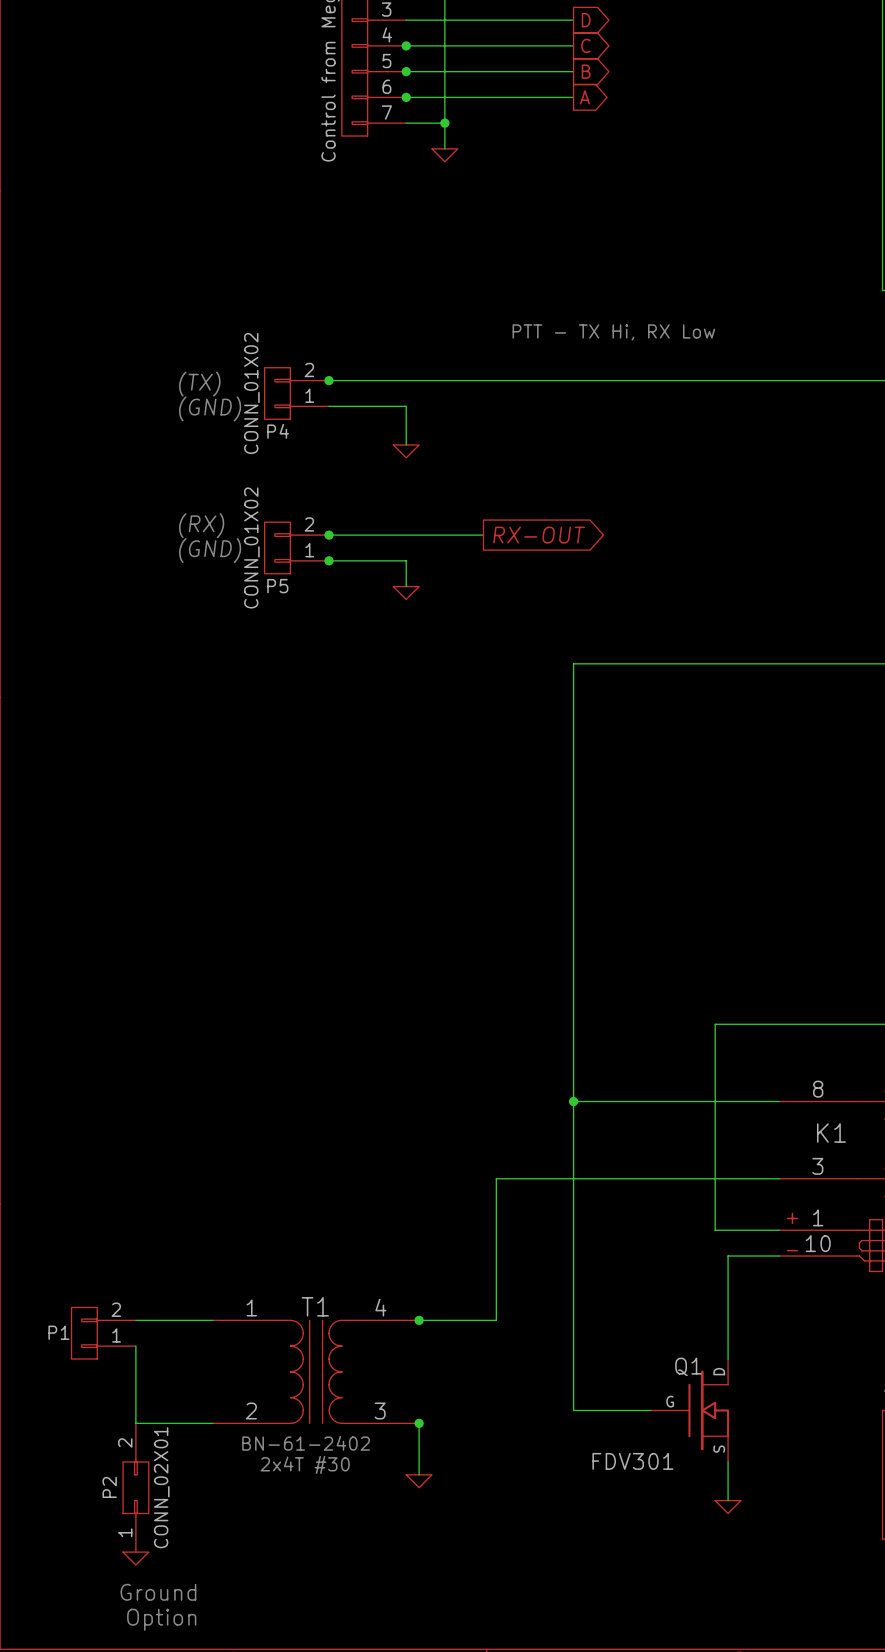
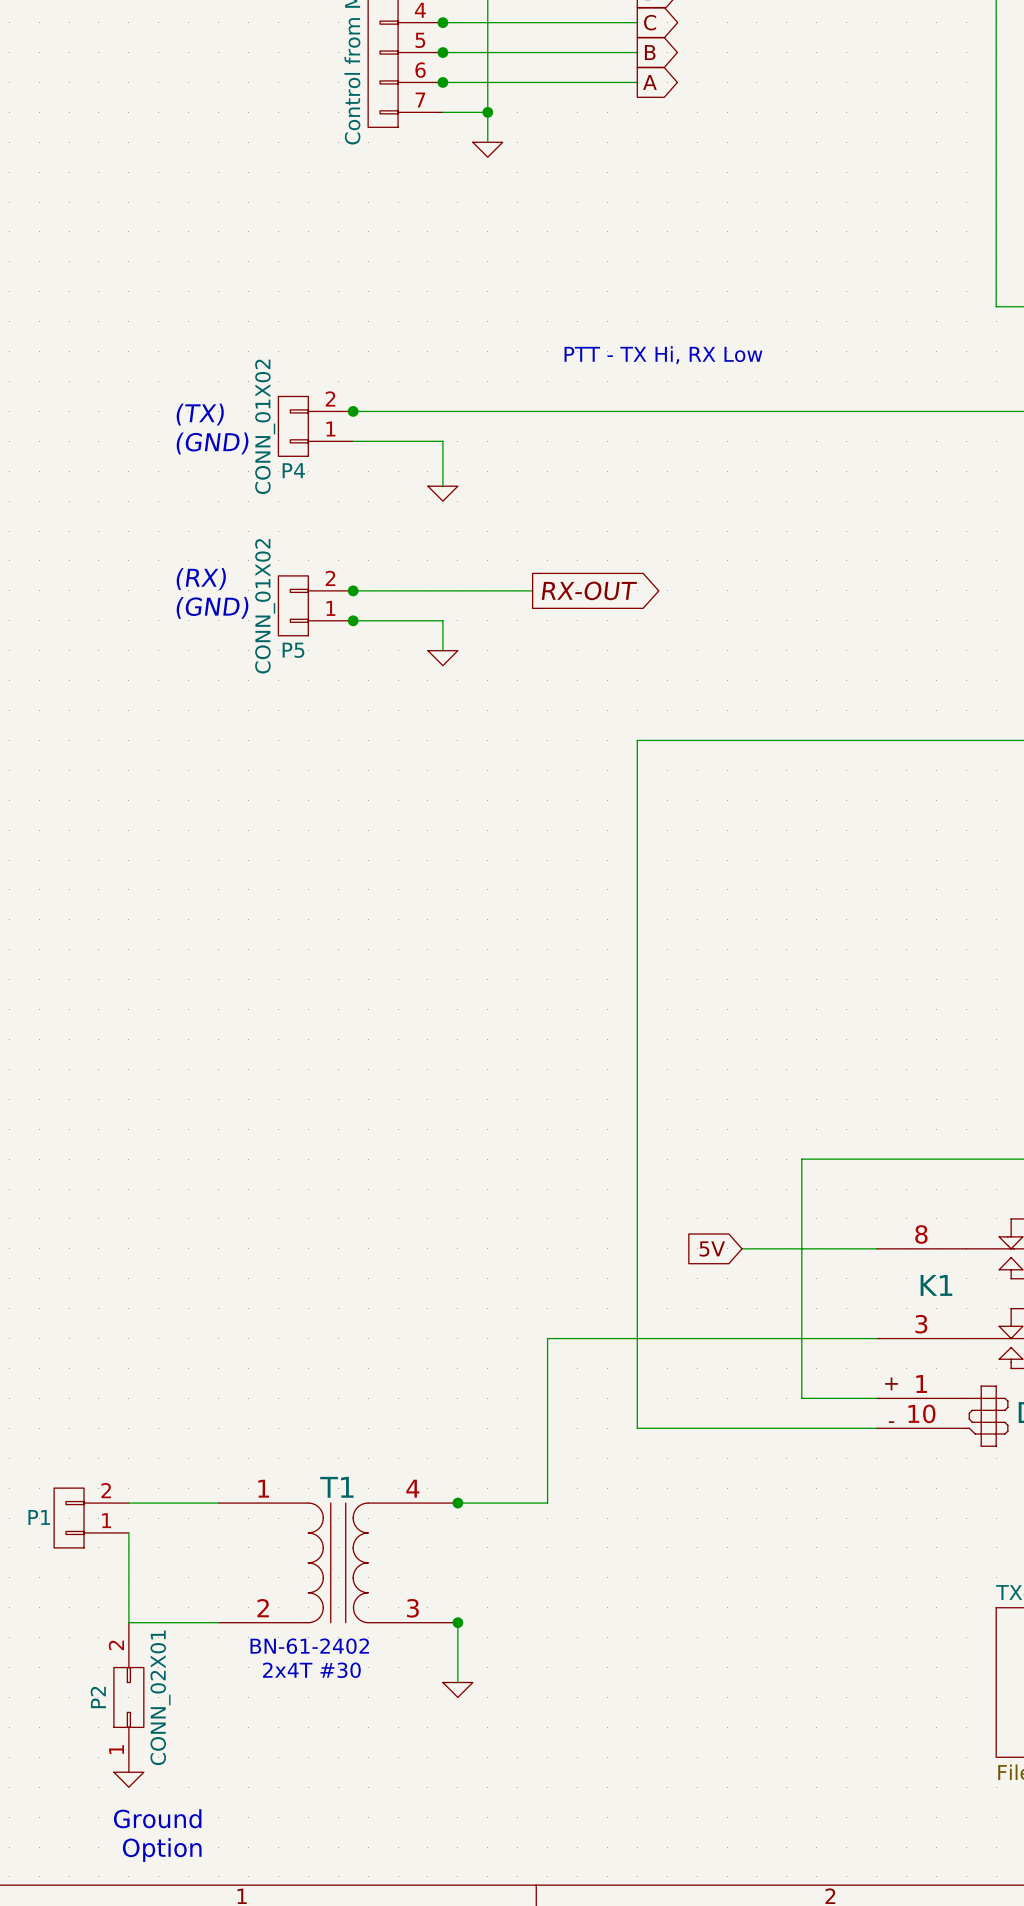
wire: (573, 1101) (663, 1101) -> none
junction: (573, 1101) -> none
global label: none -> 5V (712, 1248)
wire: (573, 1256) (573, 1410) (650, 1410) -> (637, 1428) (816, 1428)
wire: (728, 1256) (728, 1358) -> none
Q1: FDV301 (689, 1410) -> none
wire: (728, 1461) (728, 1500) -> none
power symbol: (728, 1507) -> none

